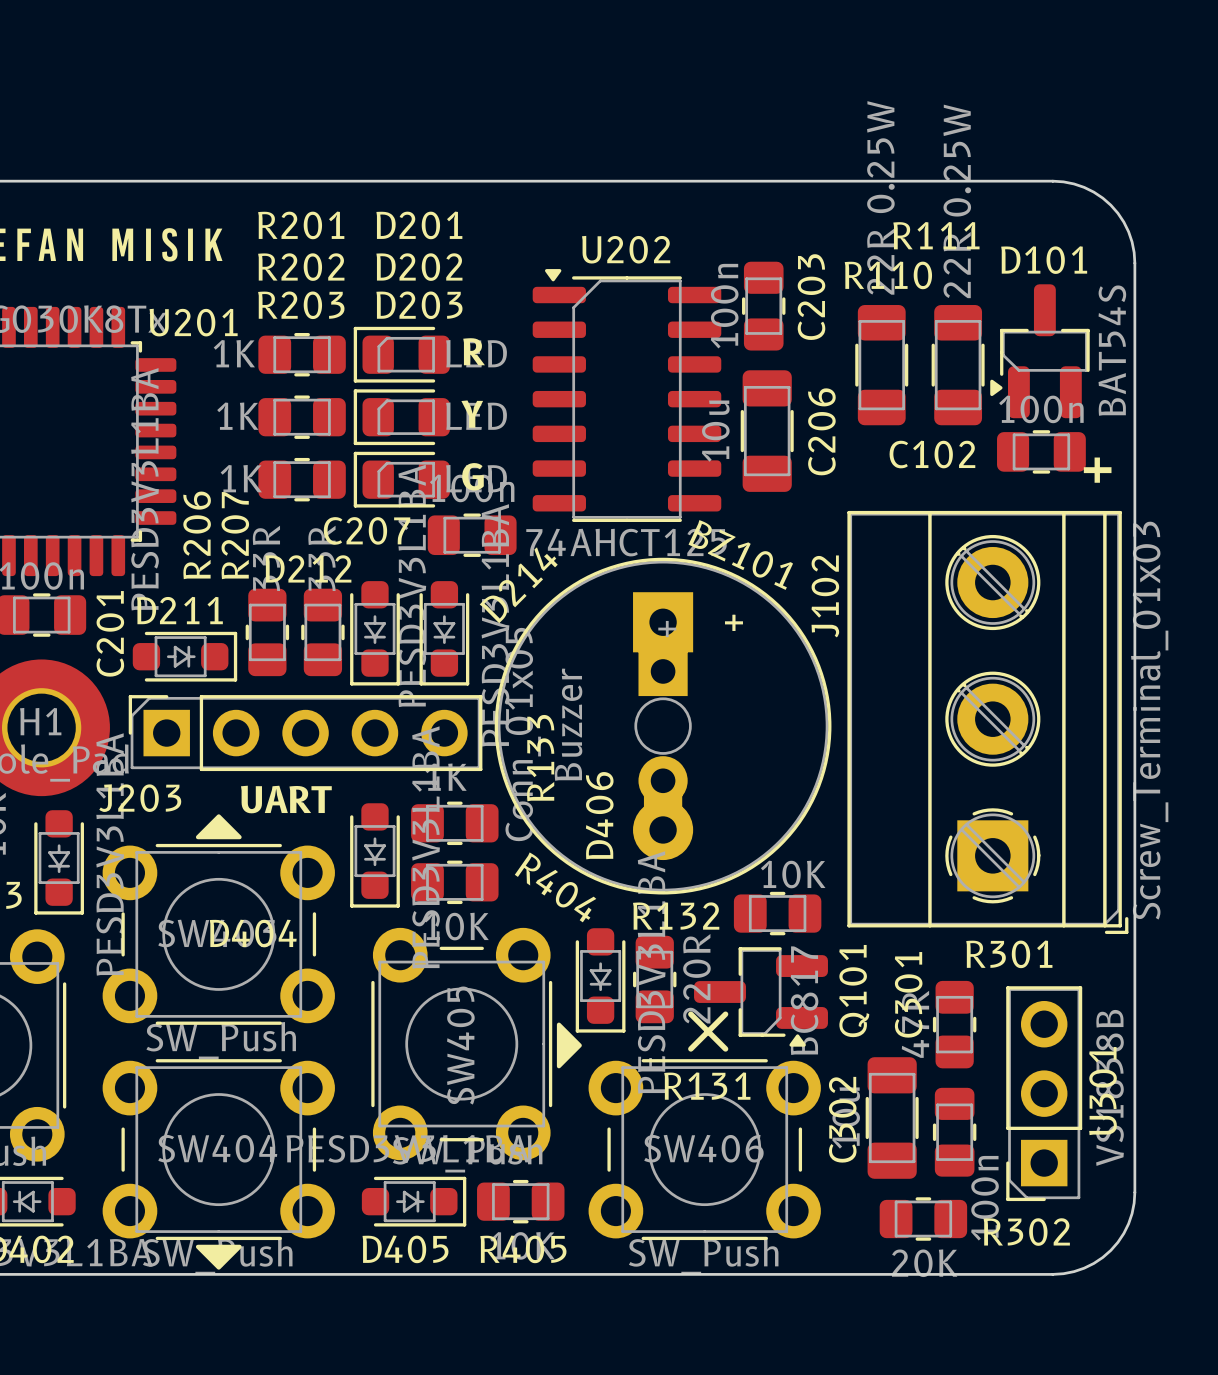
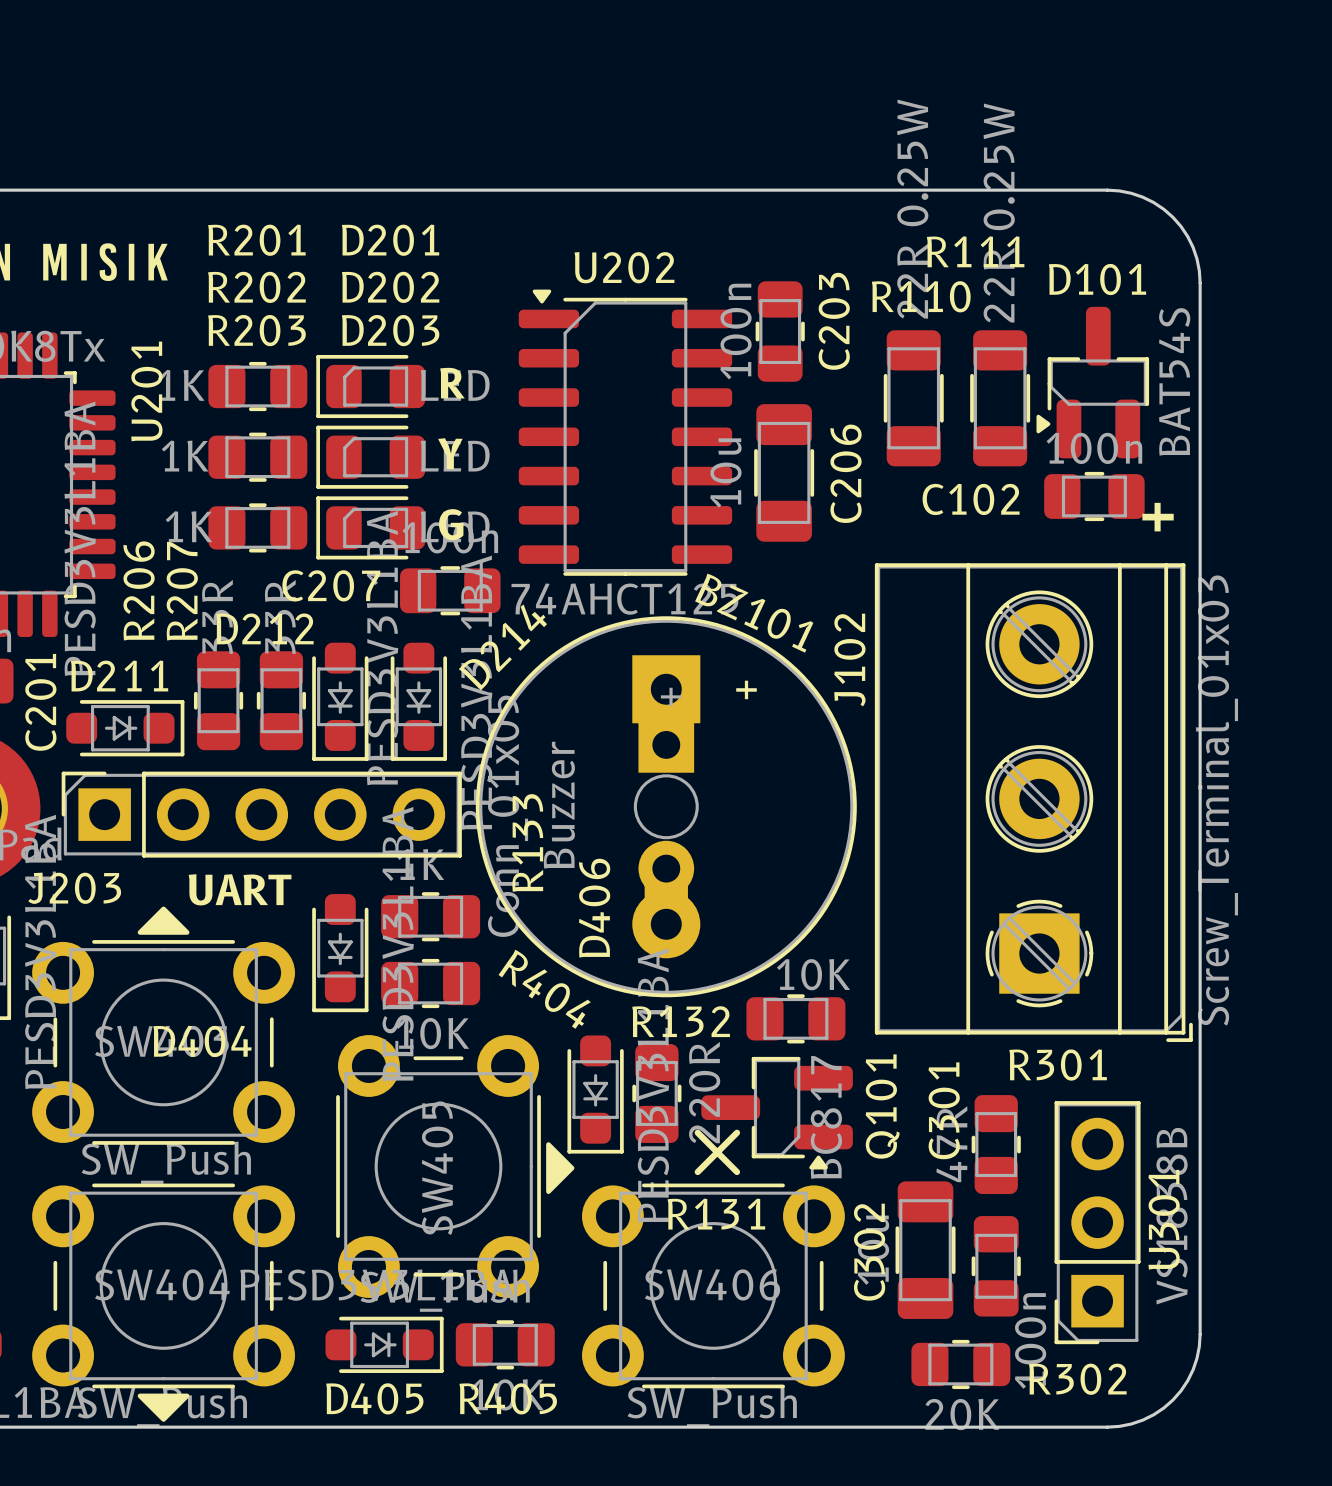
U201 name rotation: 0° (193, 322) -> 90° counterclockwise (146, 391)

